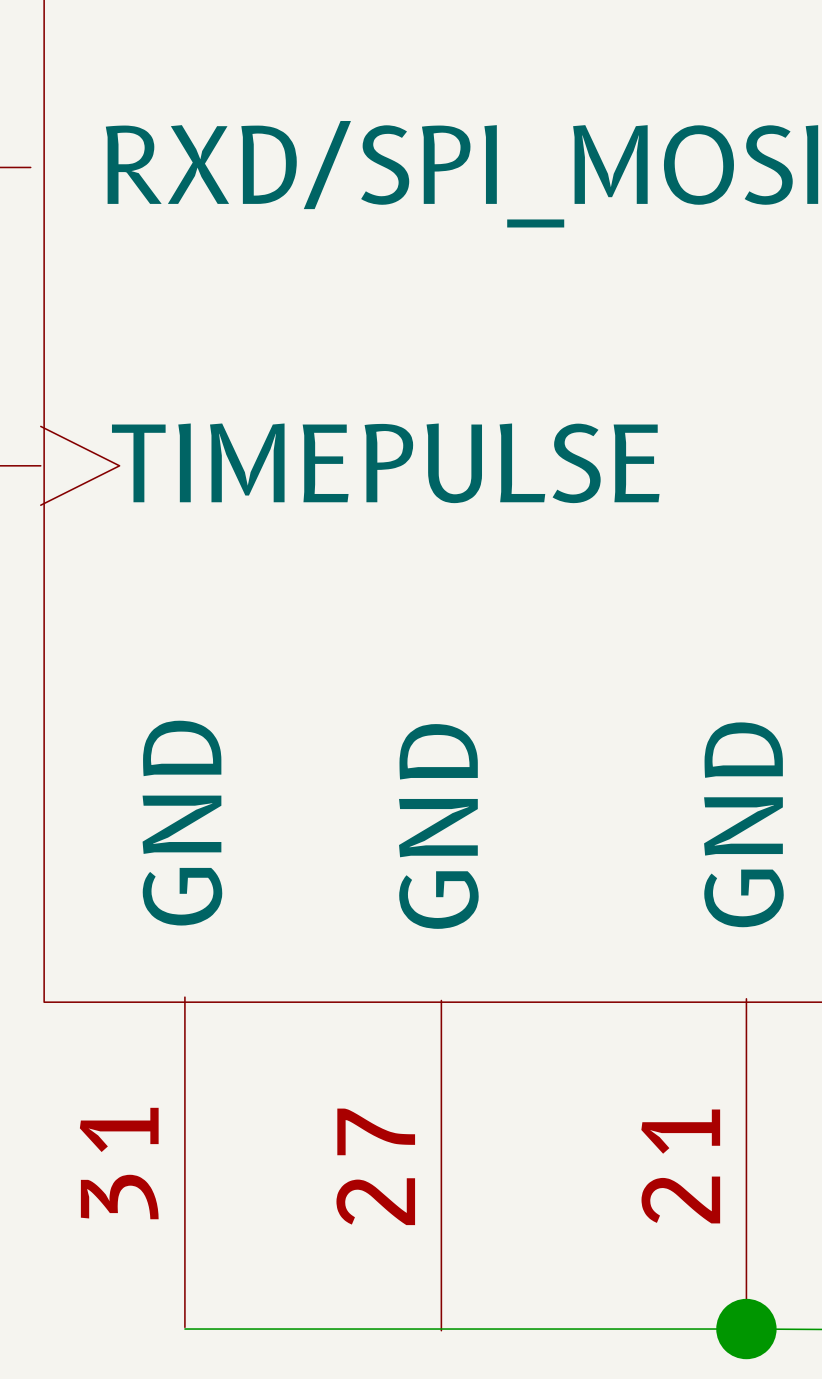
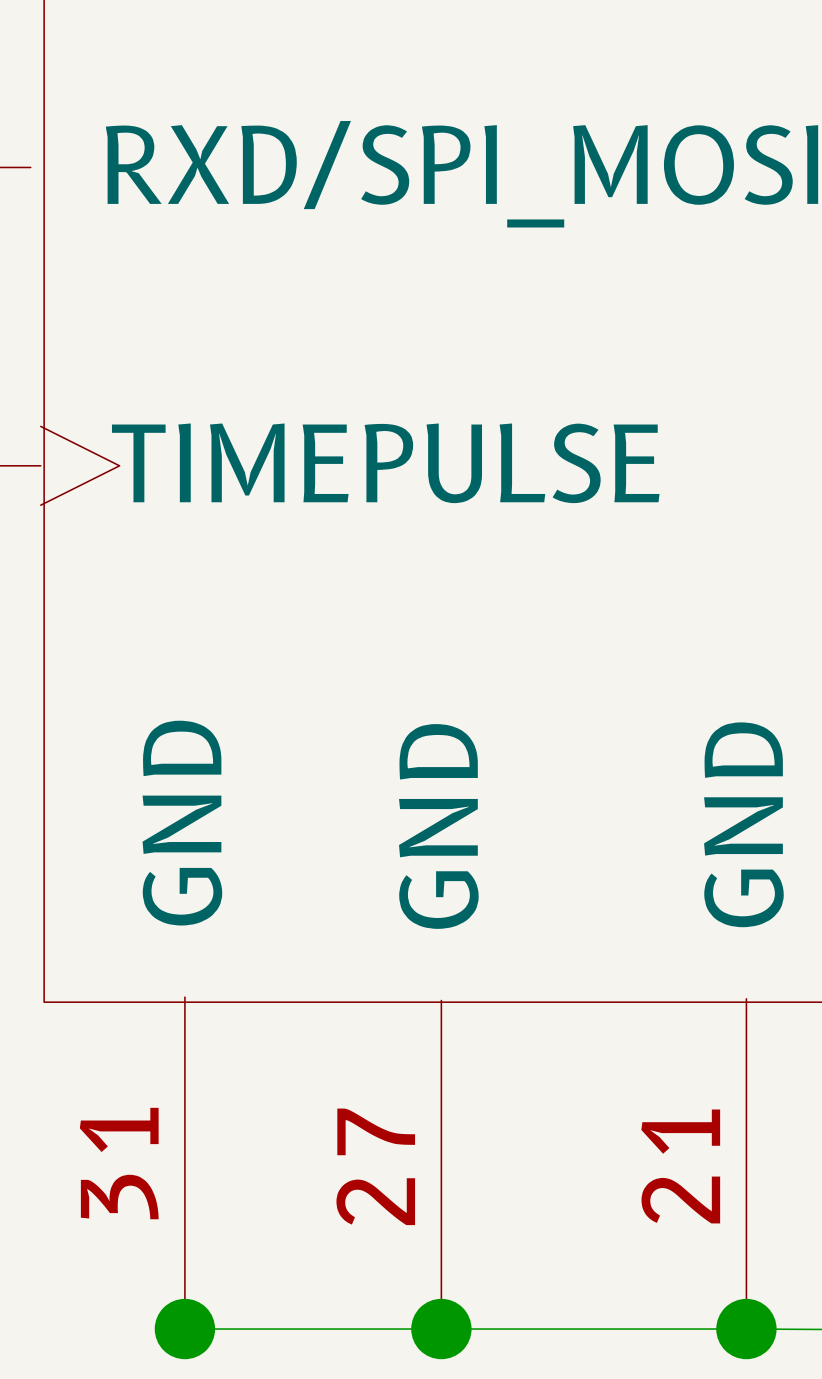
junction: none -> (184, 1329)
junction: none -> (441, 1329)

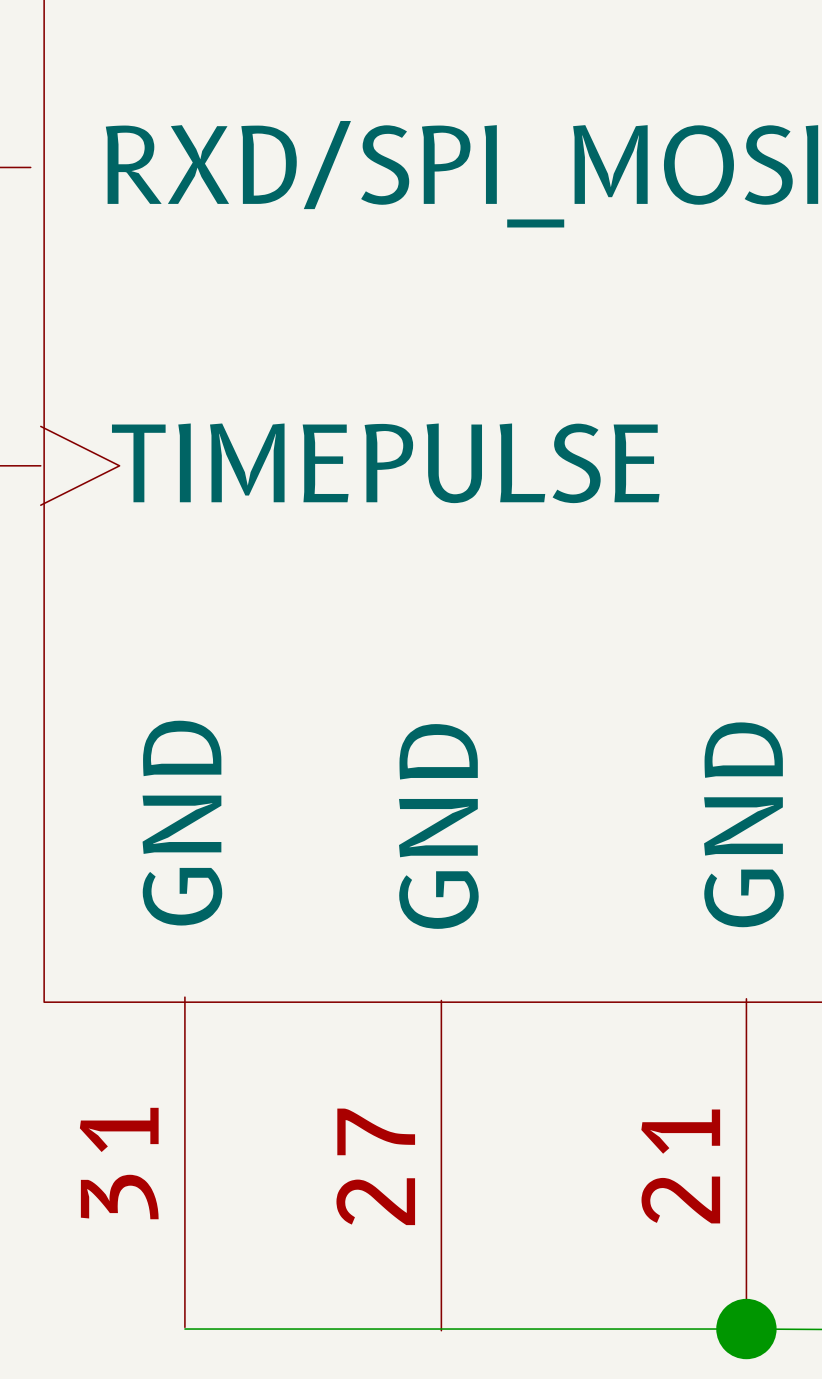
junction: (184, 1329) -> none
junction: (441, 1329) -> none

